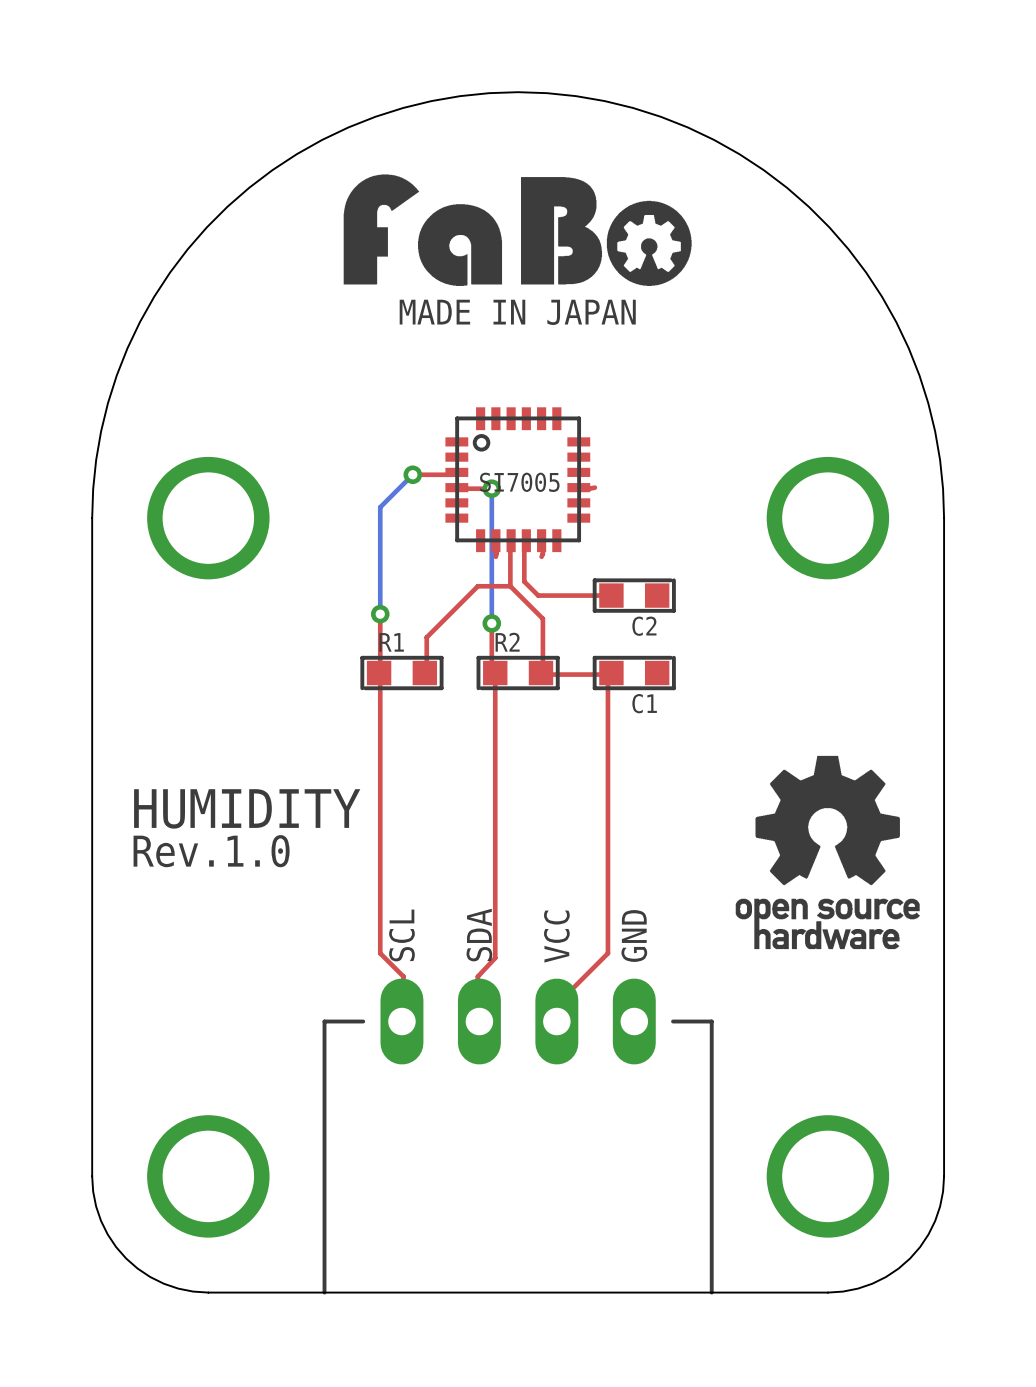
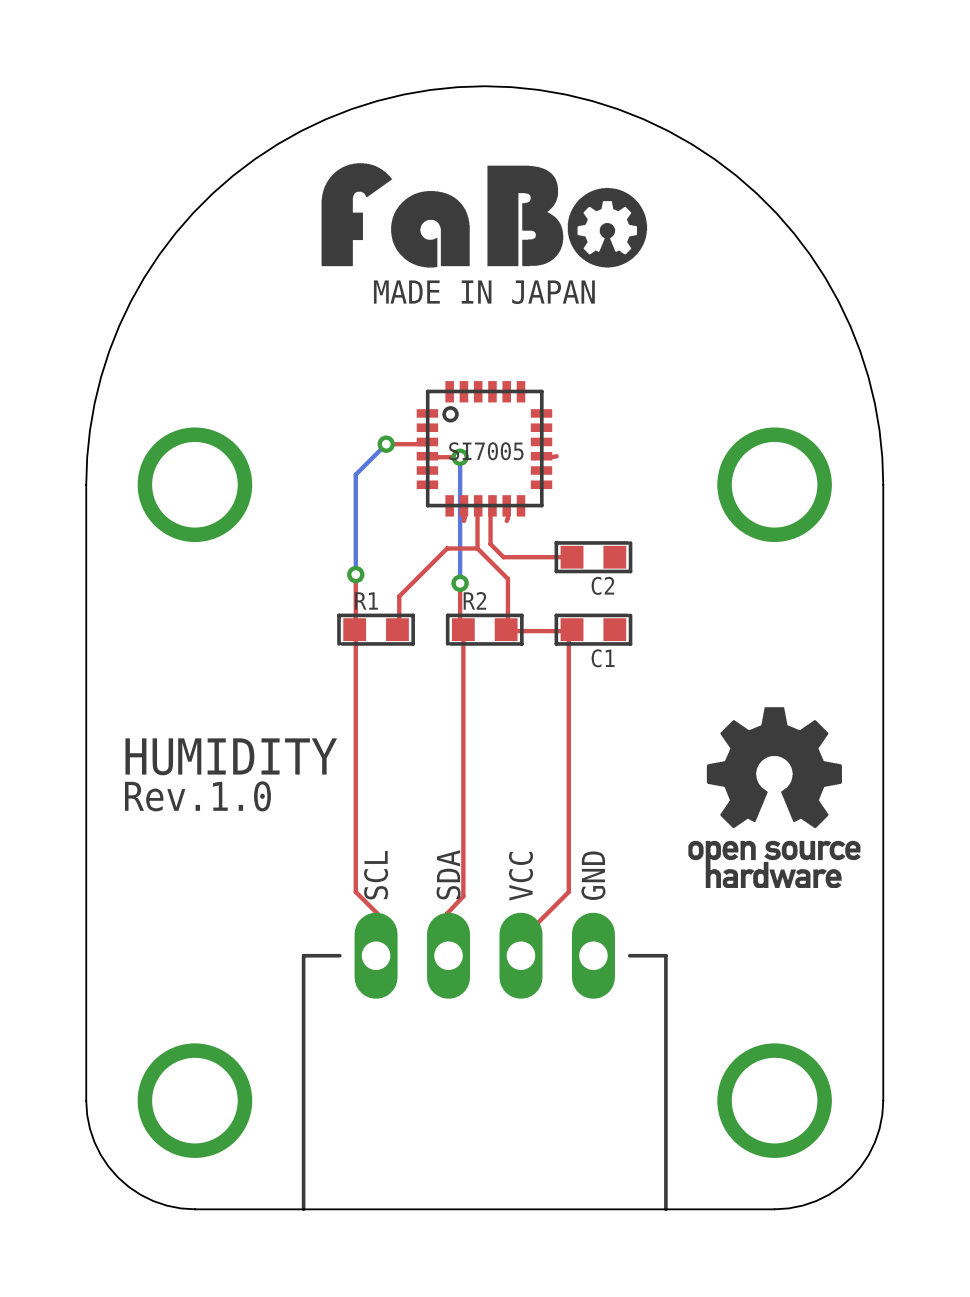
part footprint: [92, 92, 945, 1295] -> [86, 86, 884, 1212]

